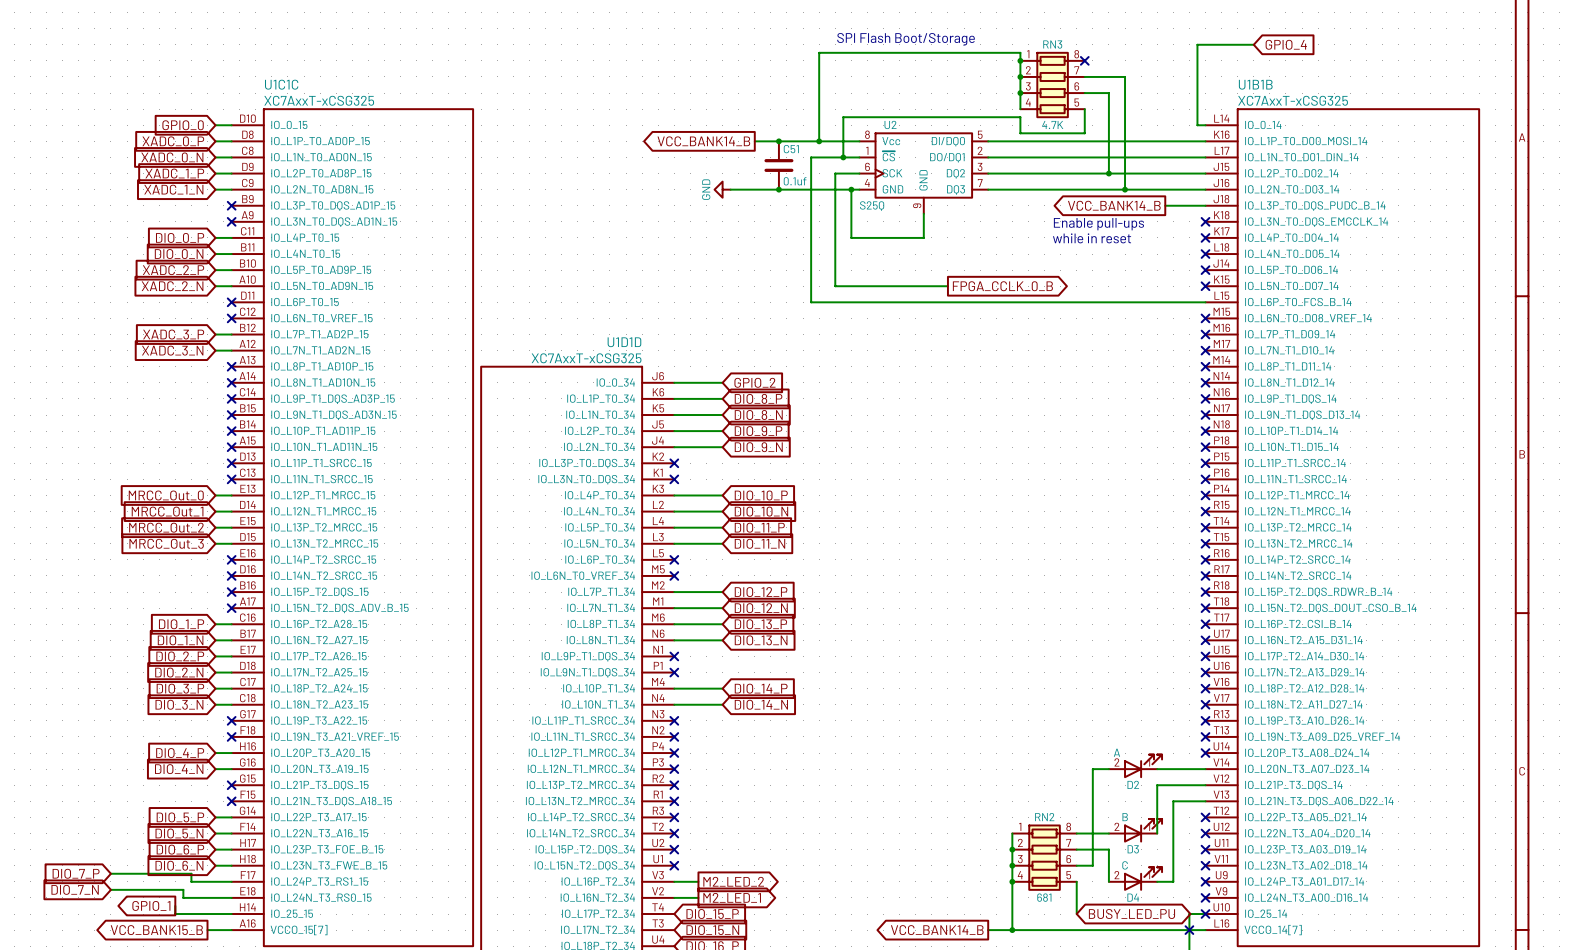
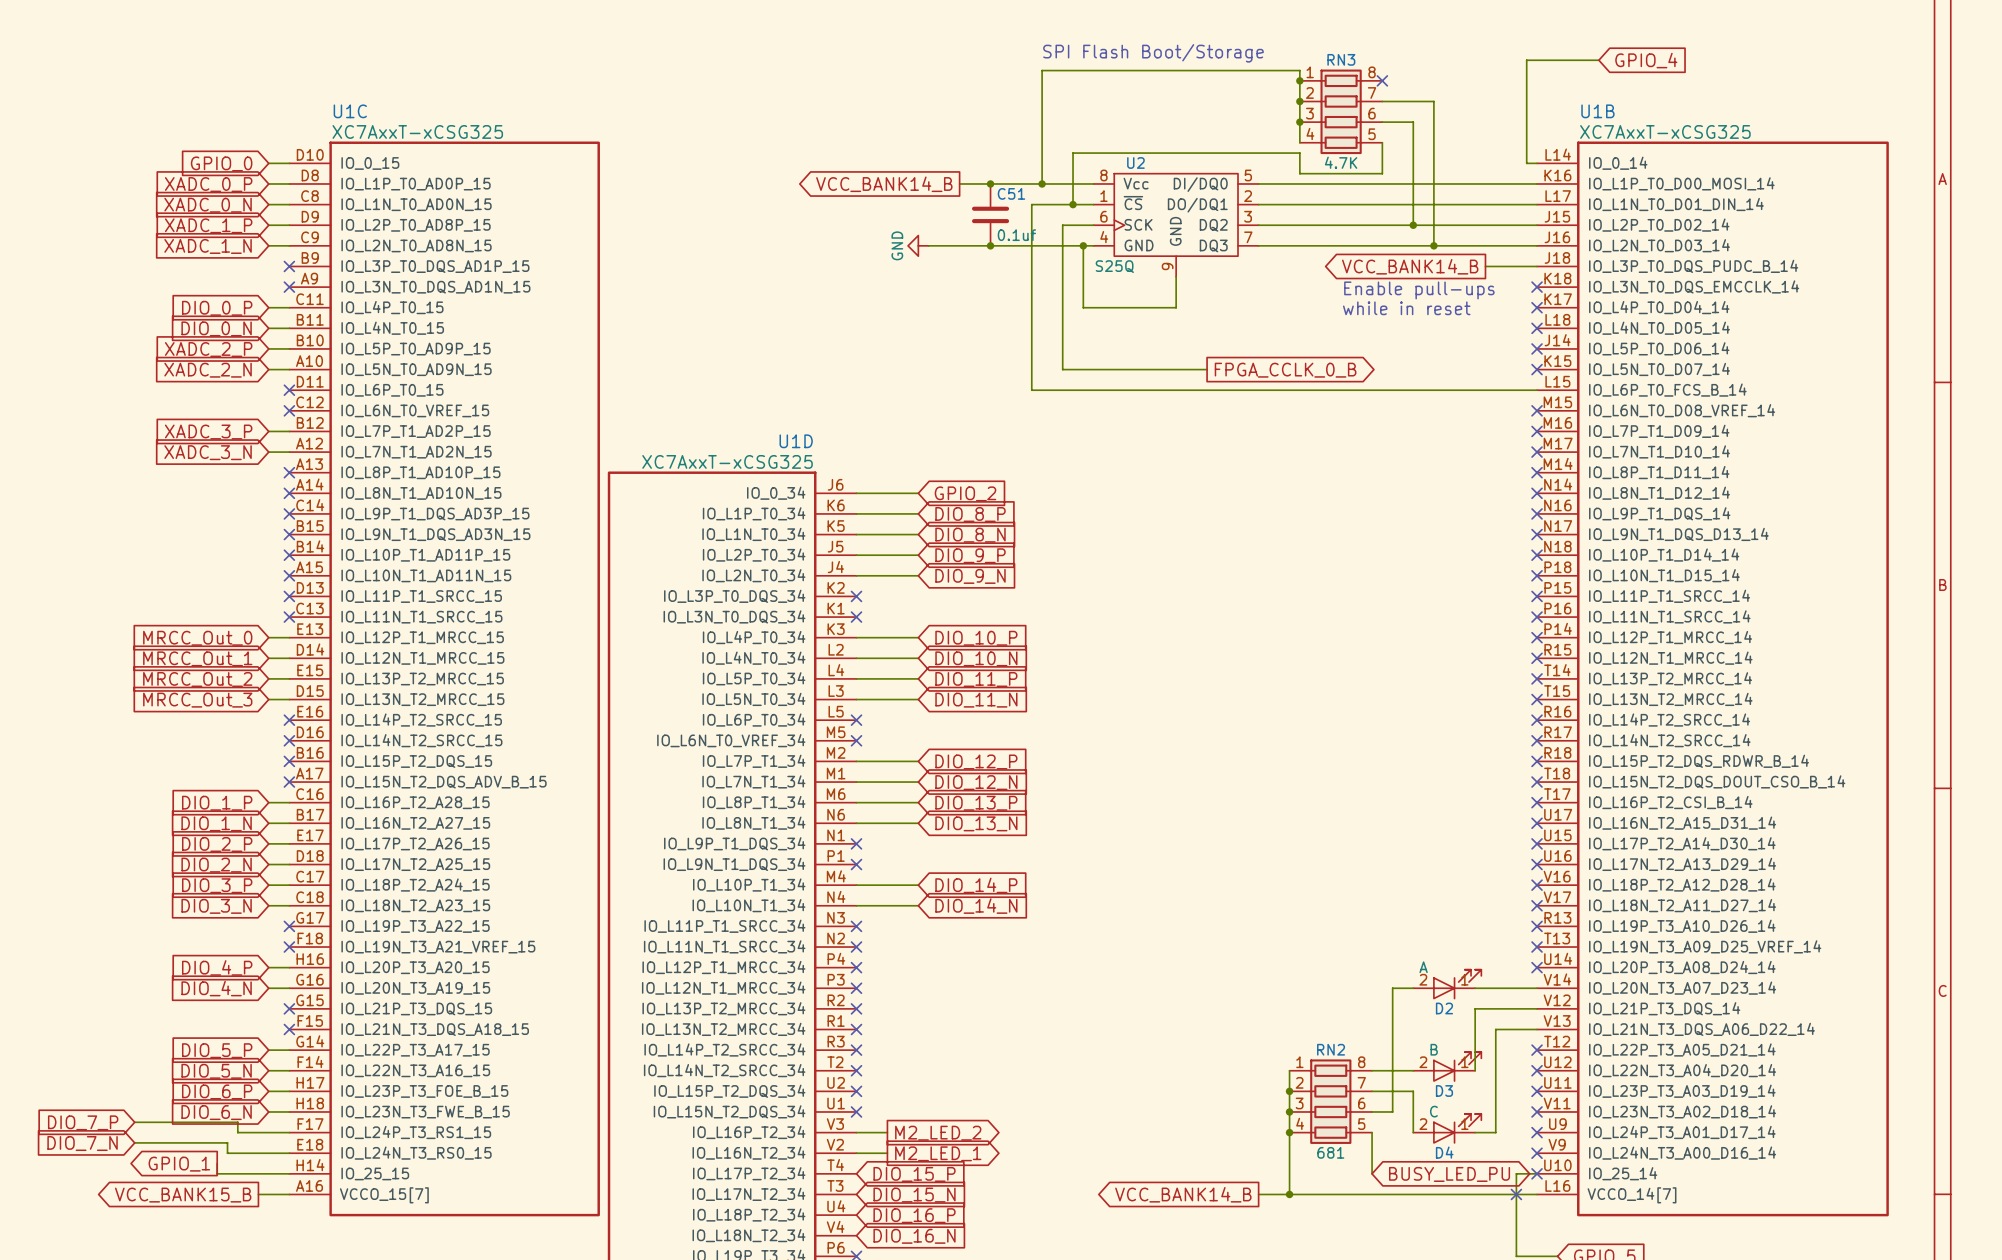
U1C1C name: U1C1C (281, 84) -> U1C (350, 111)
U1B1B name: U1B1B (1255, 84) -> U1B (1597, 111)
U1D1D name: U1D1D (624, 342) -> U1D (796, 441)

